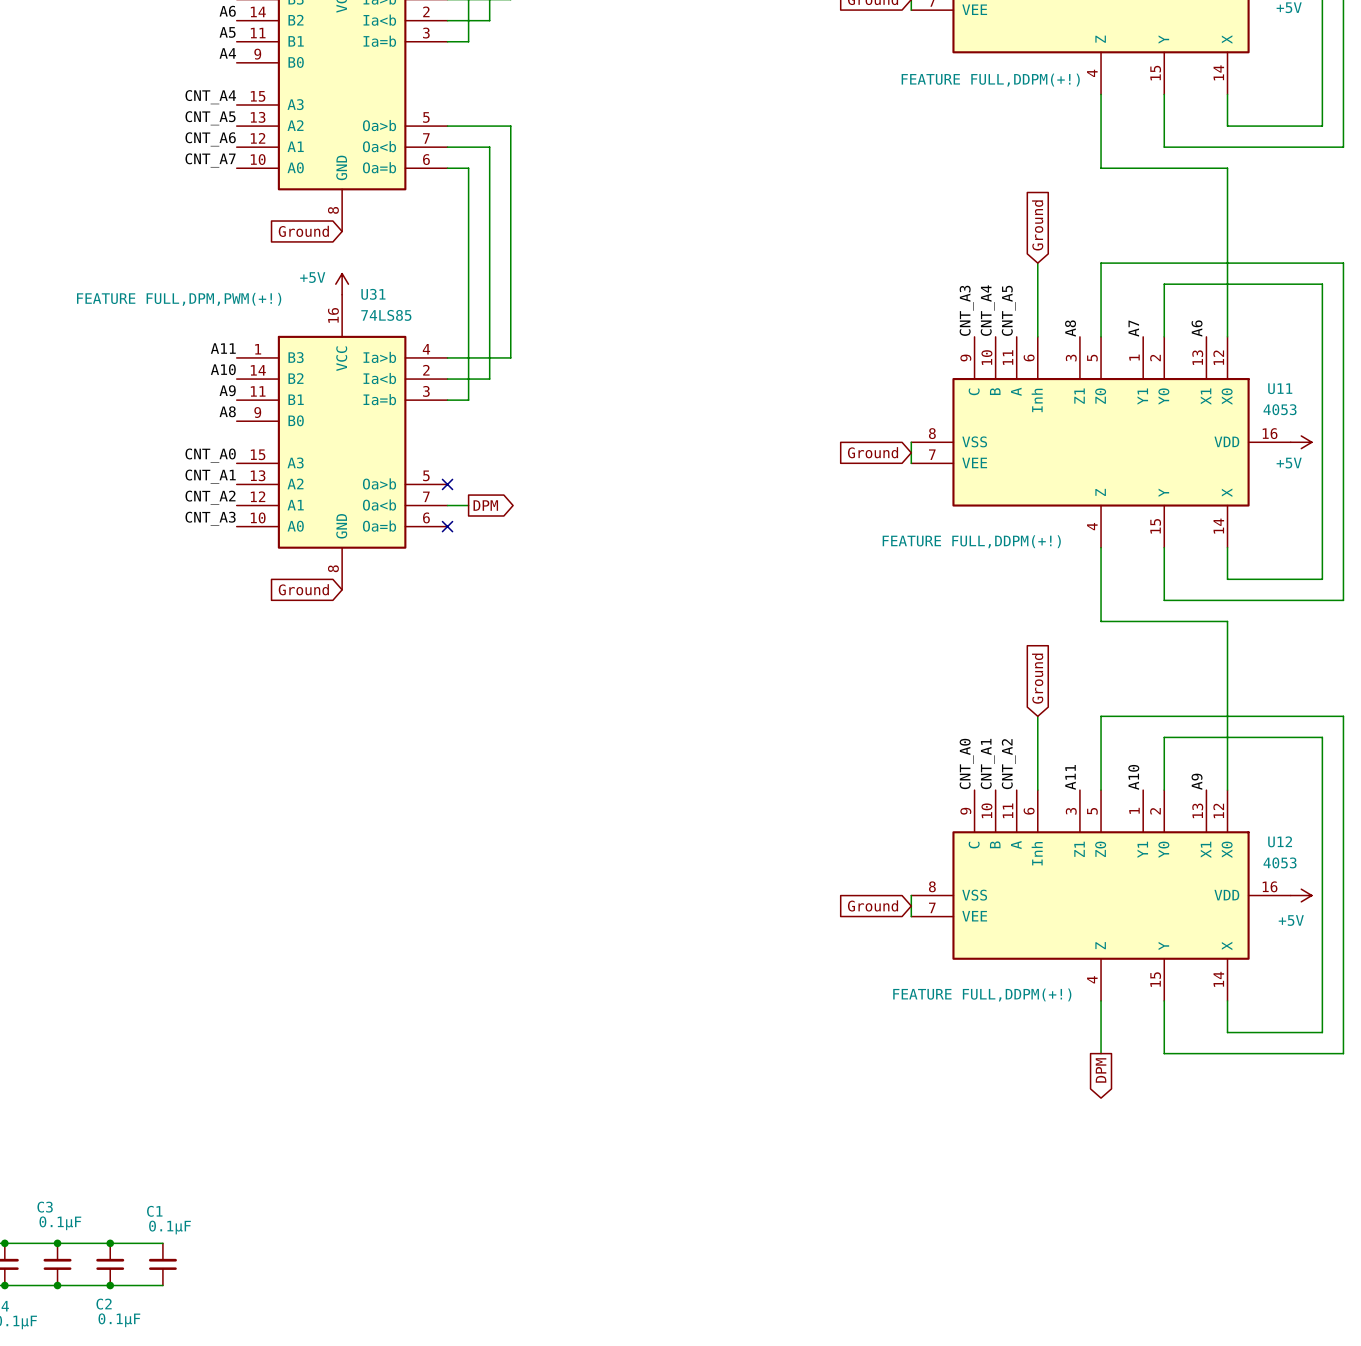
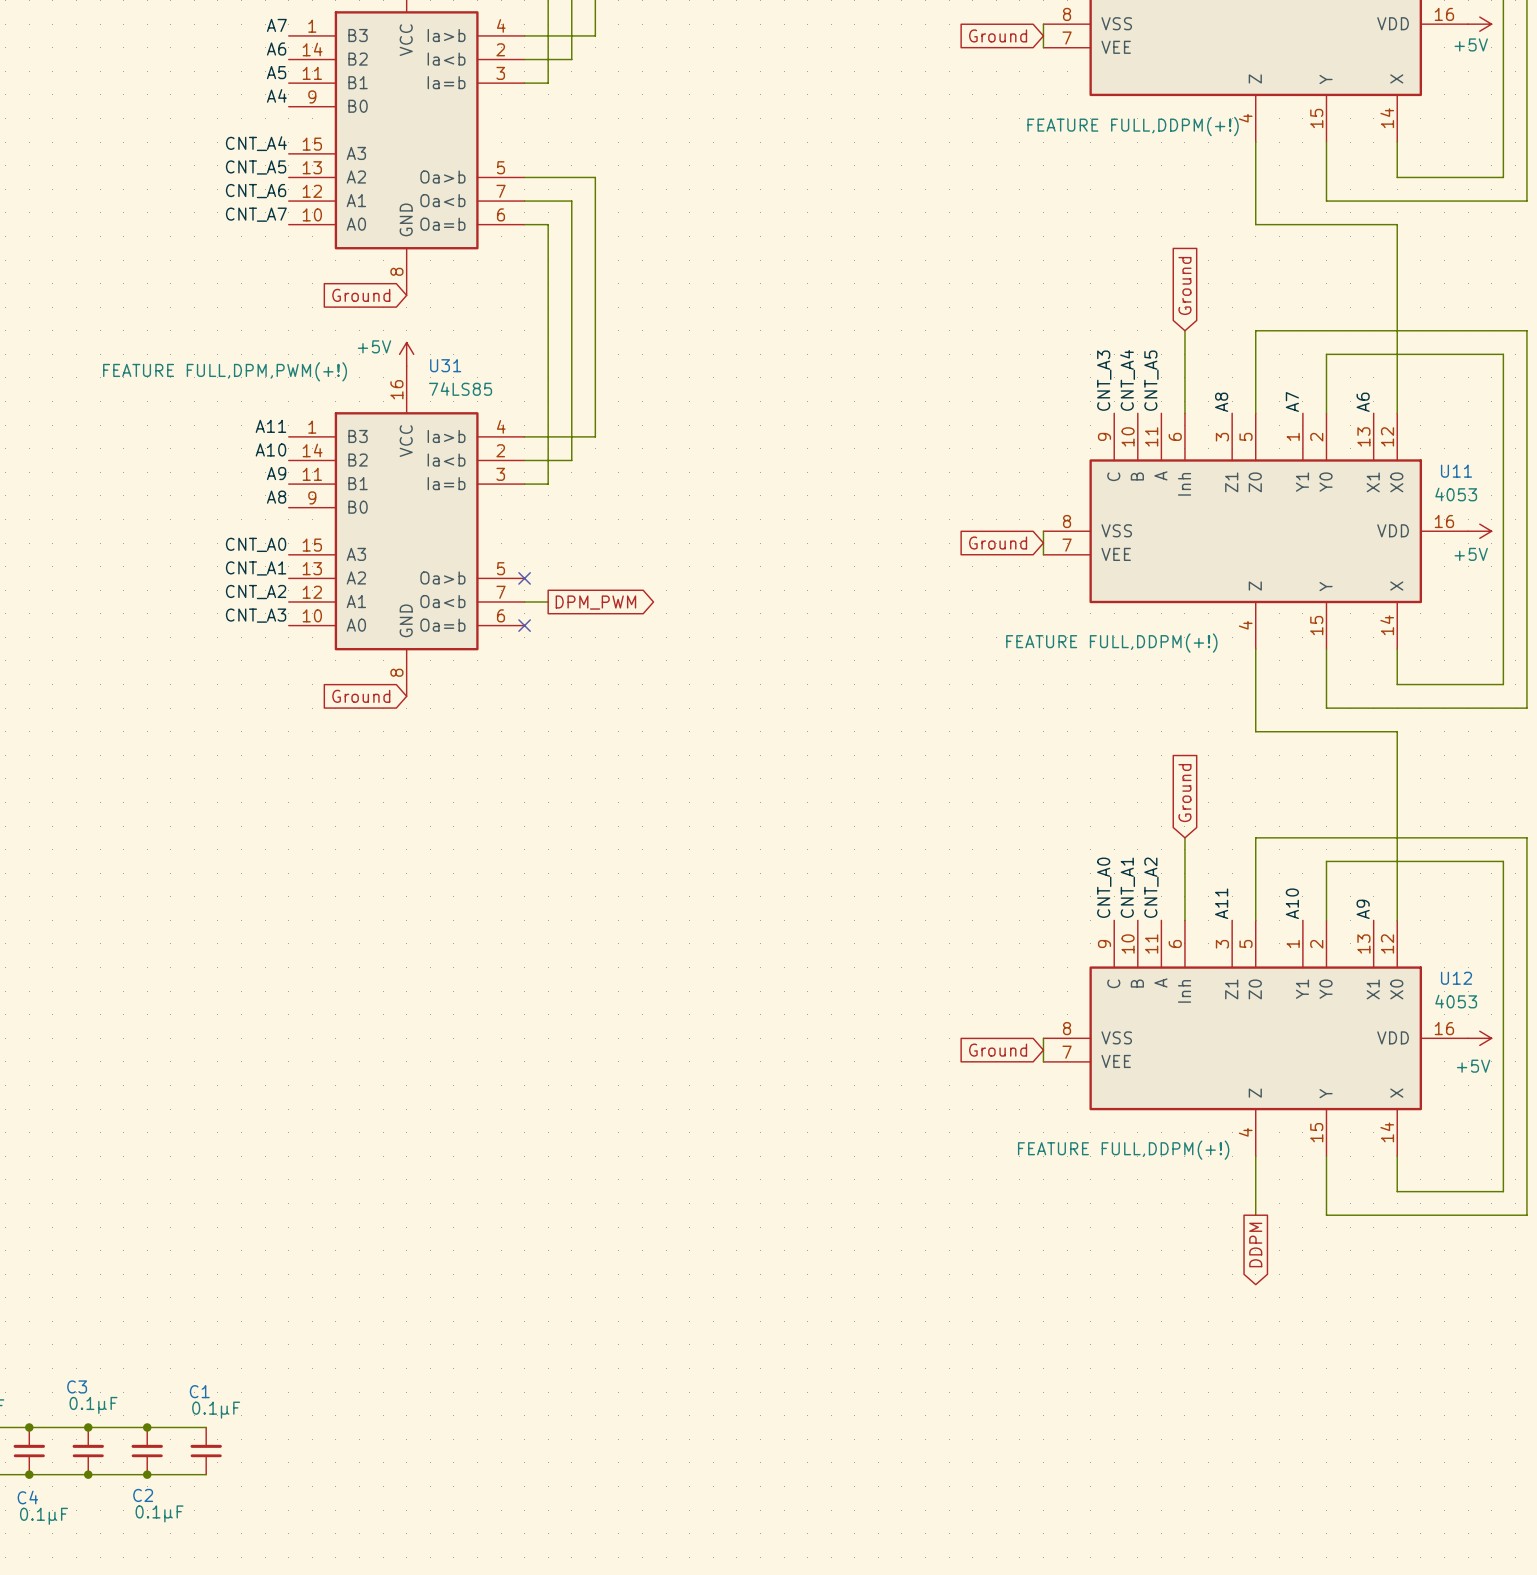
global label: DPM (485, 505) -> DPM_PWM (595, 602)
global label: DPM (1101, 1070) -> DDPM (1255, 1245)

